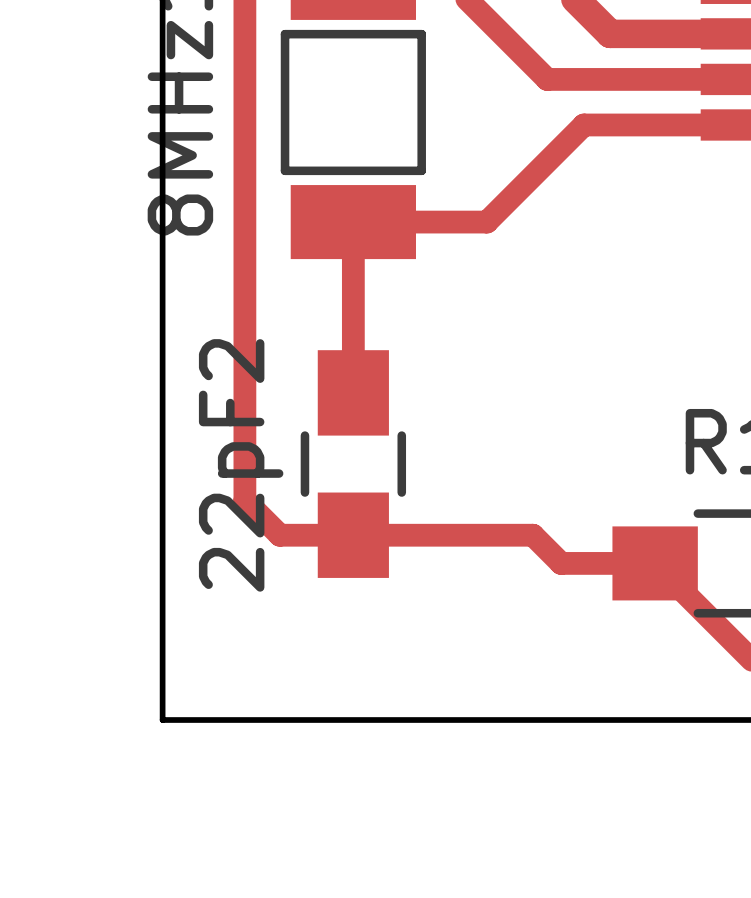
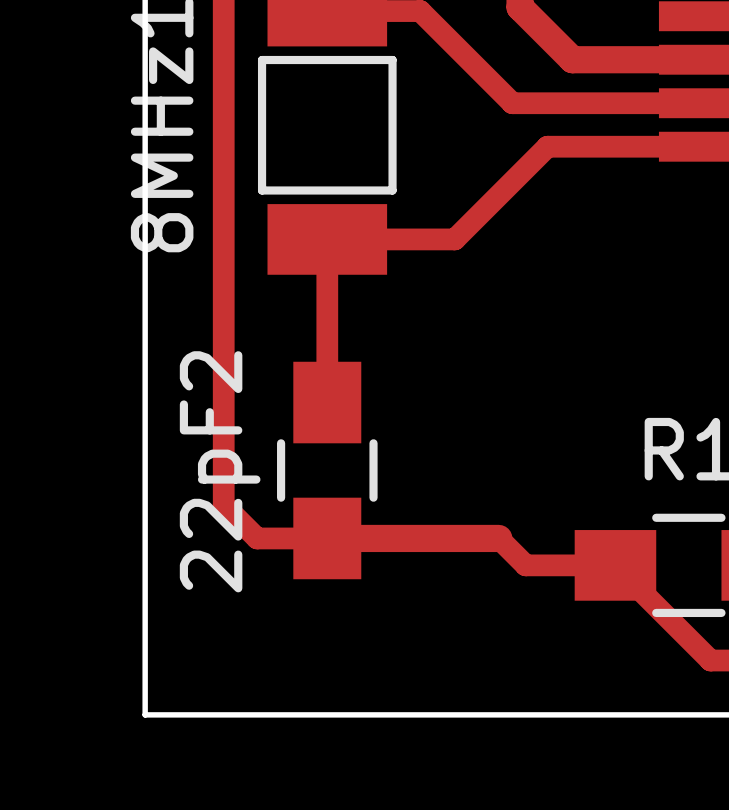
top track width: thin (353, 535) (533, 535) -> thick (327, 538) (498, 538)

